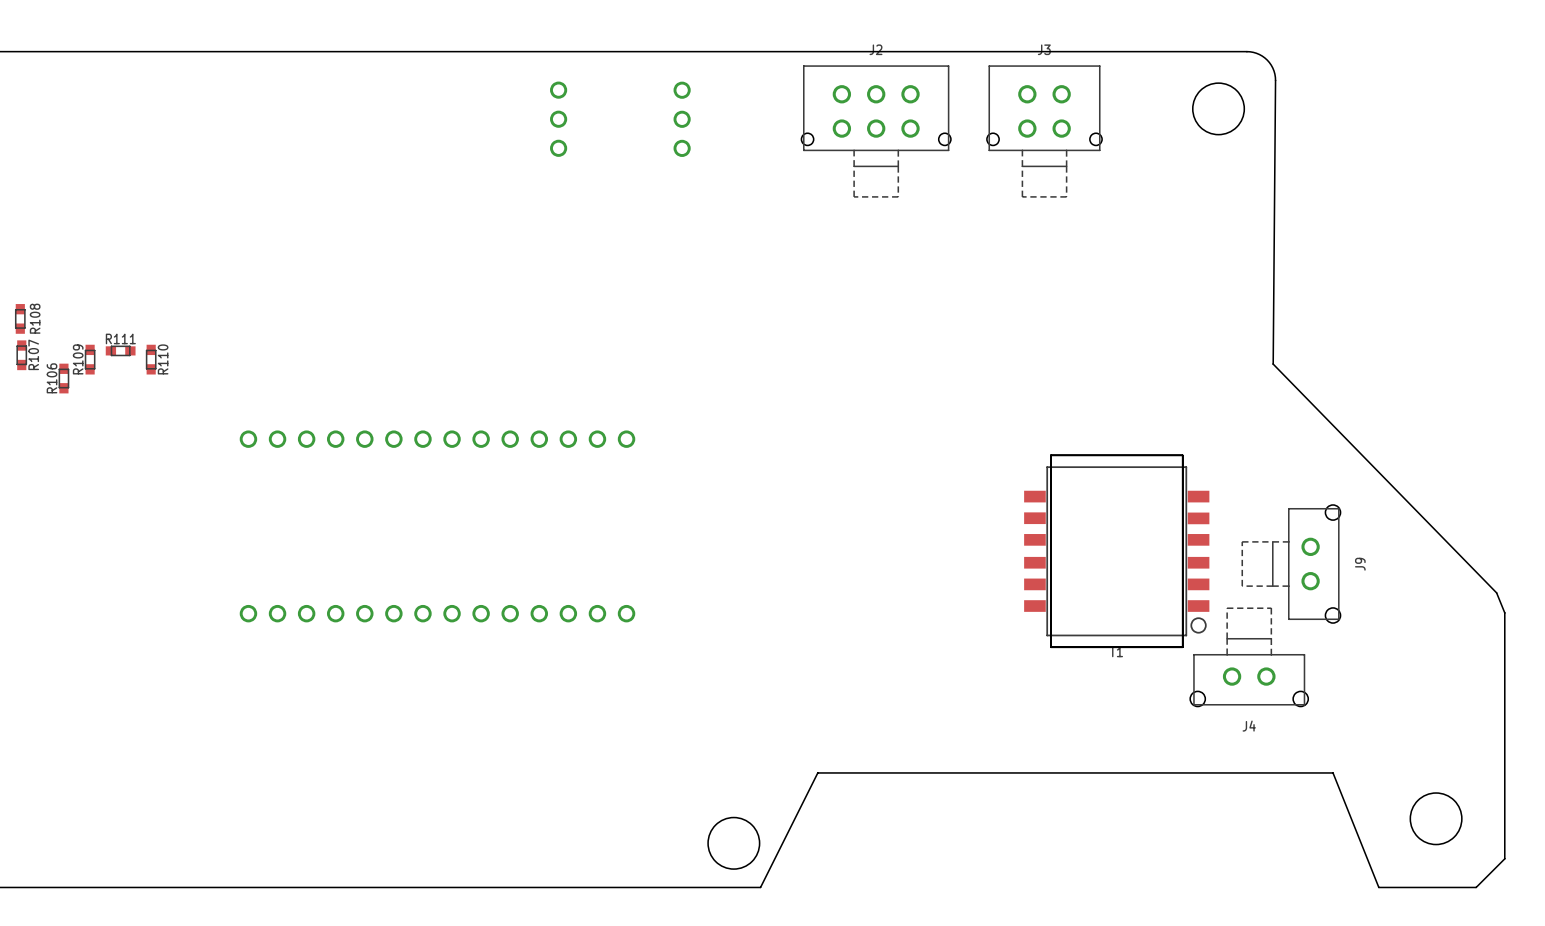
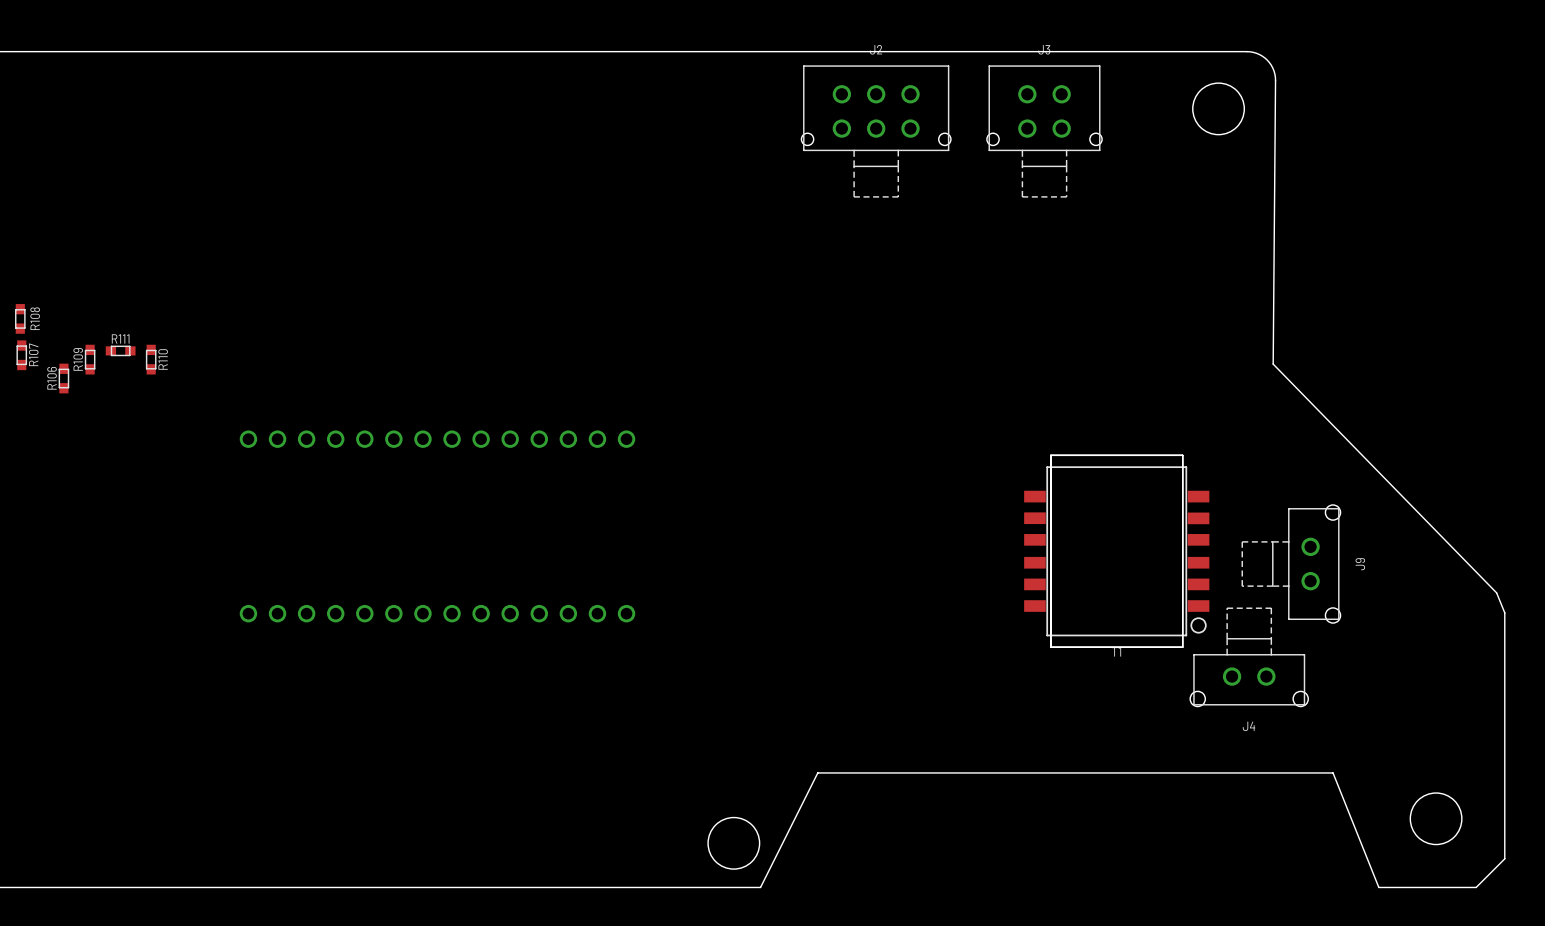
part: (558, 119) -> none
part: (682, 119) -> none

